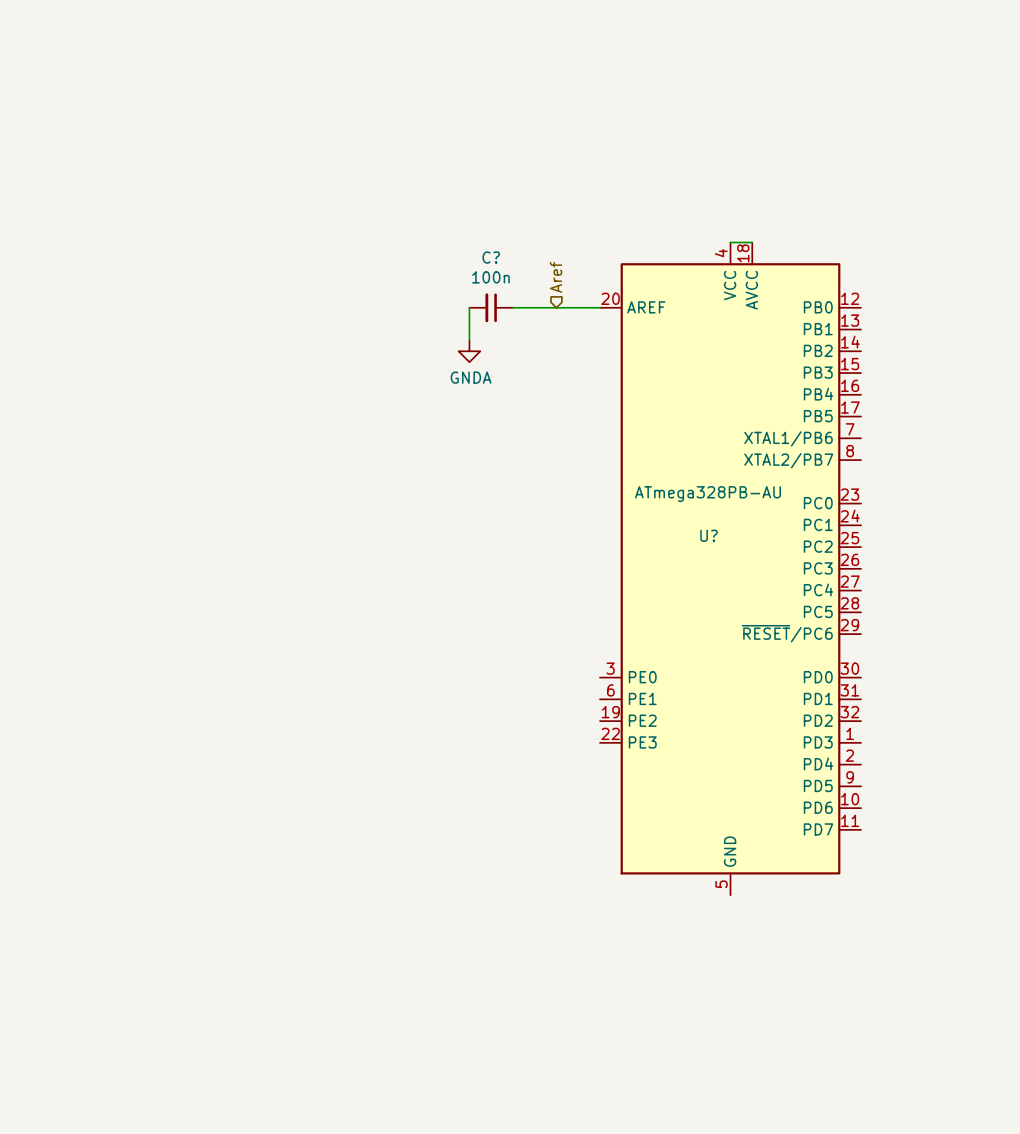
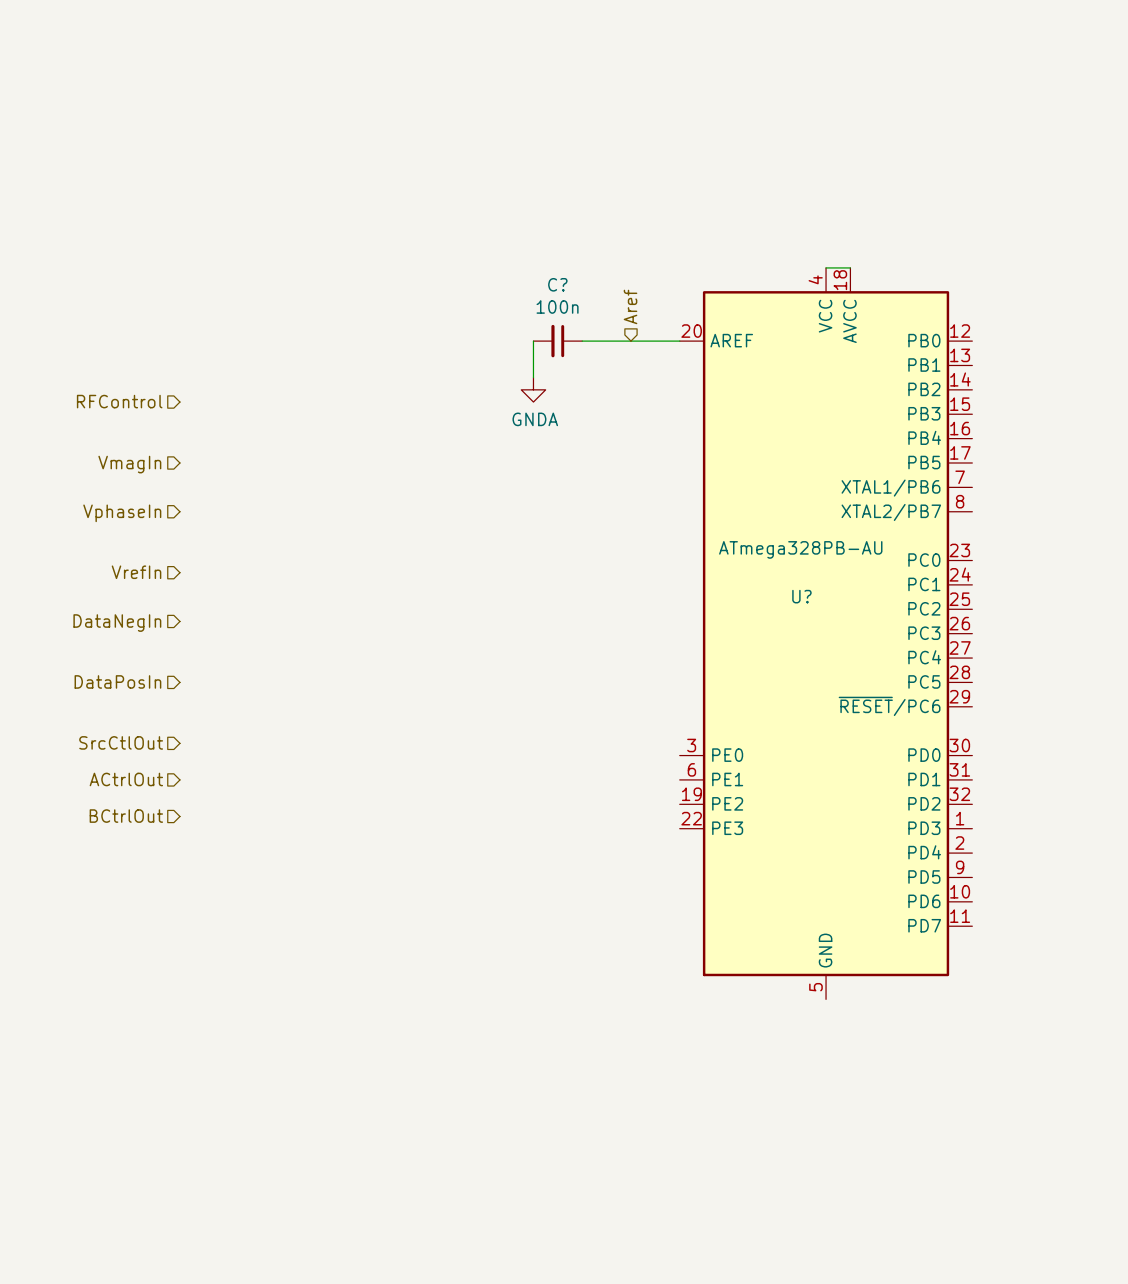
hierarchical label: none -> RFControl (119, 401)
hierarchical label: none -> VmagIn (129, 464)
hierarchical label: none -> VphaseIn (122, 513)
hierarchical label: none -> VrefIn (136, 572)
hierarchical label: none -> DataNegIn (117, 623)
hierarchical label: none -> DataPosIn (117, 681)
hierarchical label: none -> SrcCtlOut (121, 742)
hierarchical label: none -> ACtrlOut (126, 779)
hierarchical label: none -> BCtrlOut (126, 816)

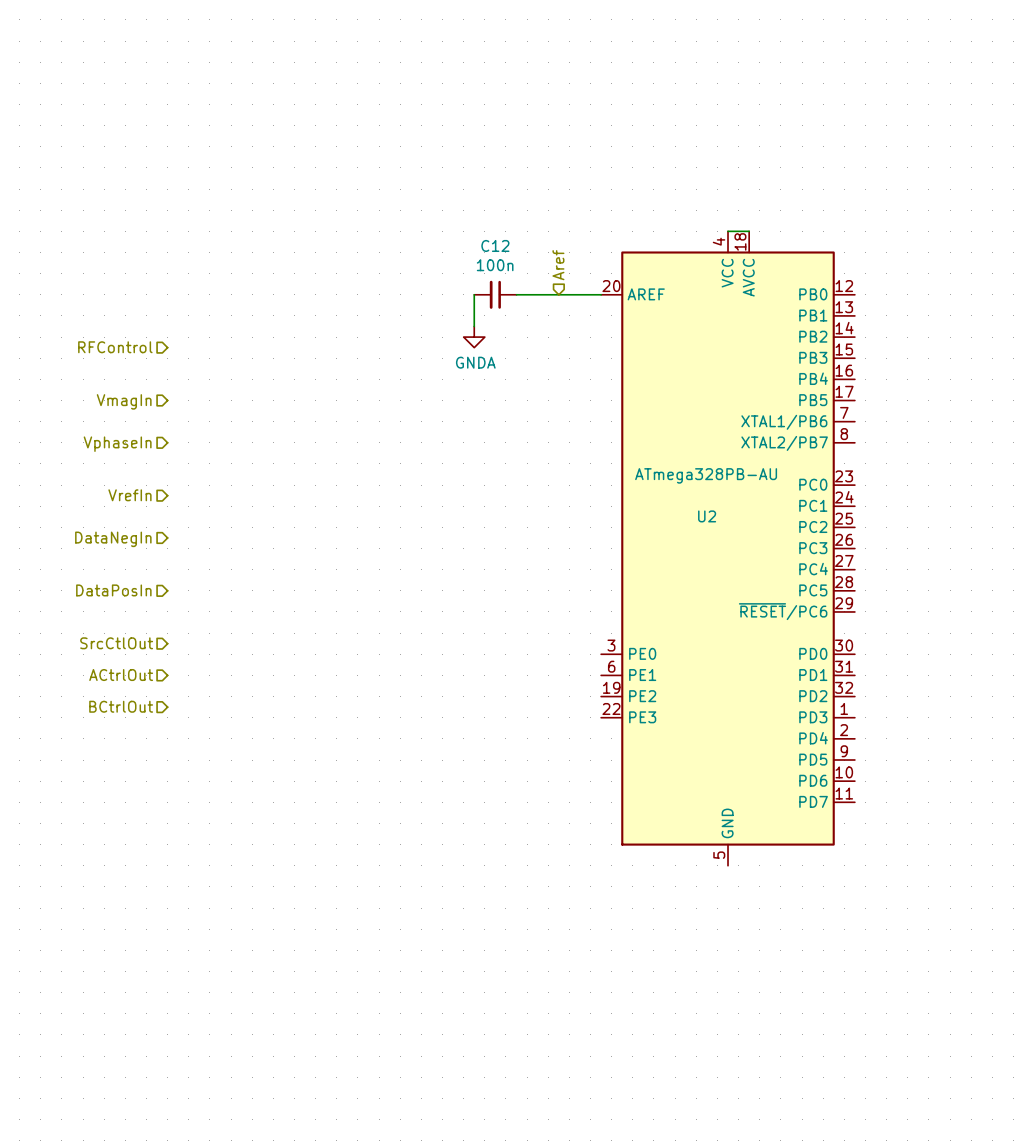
C? name: C? (557, 284) -> C12 (495, 245)
U? name: U? (801, 596) -> U2 (707, 516)

